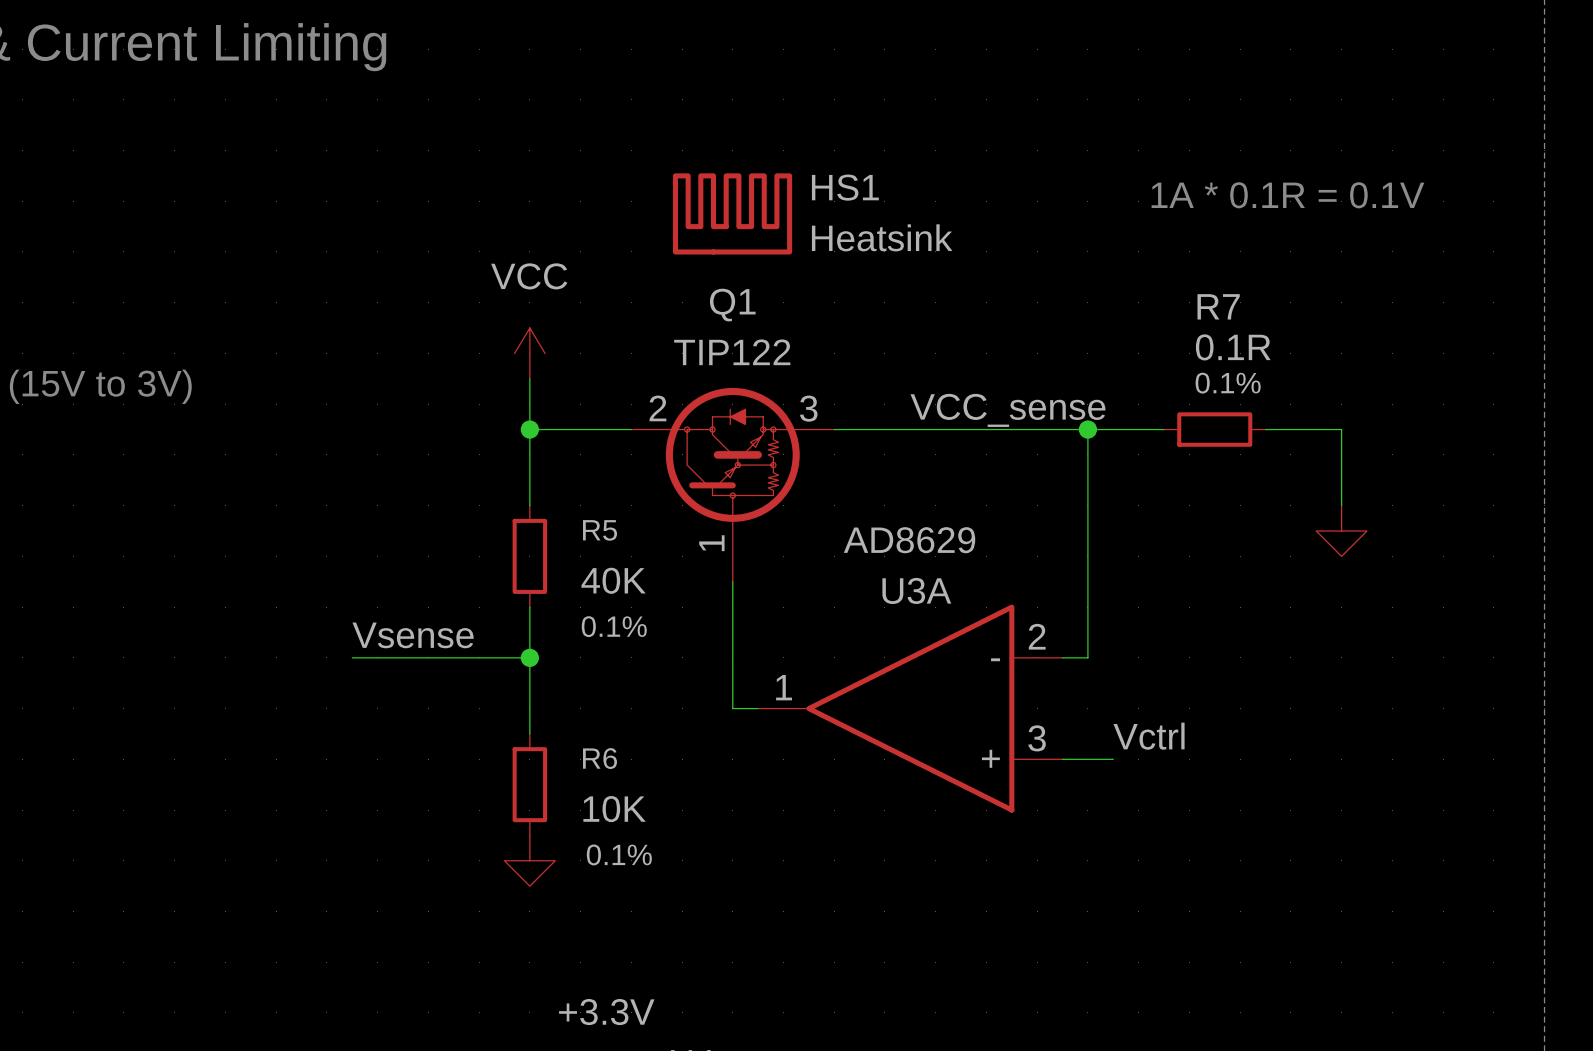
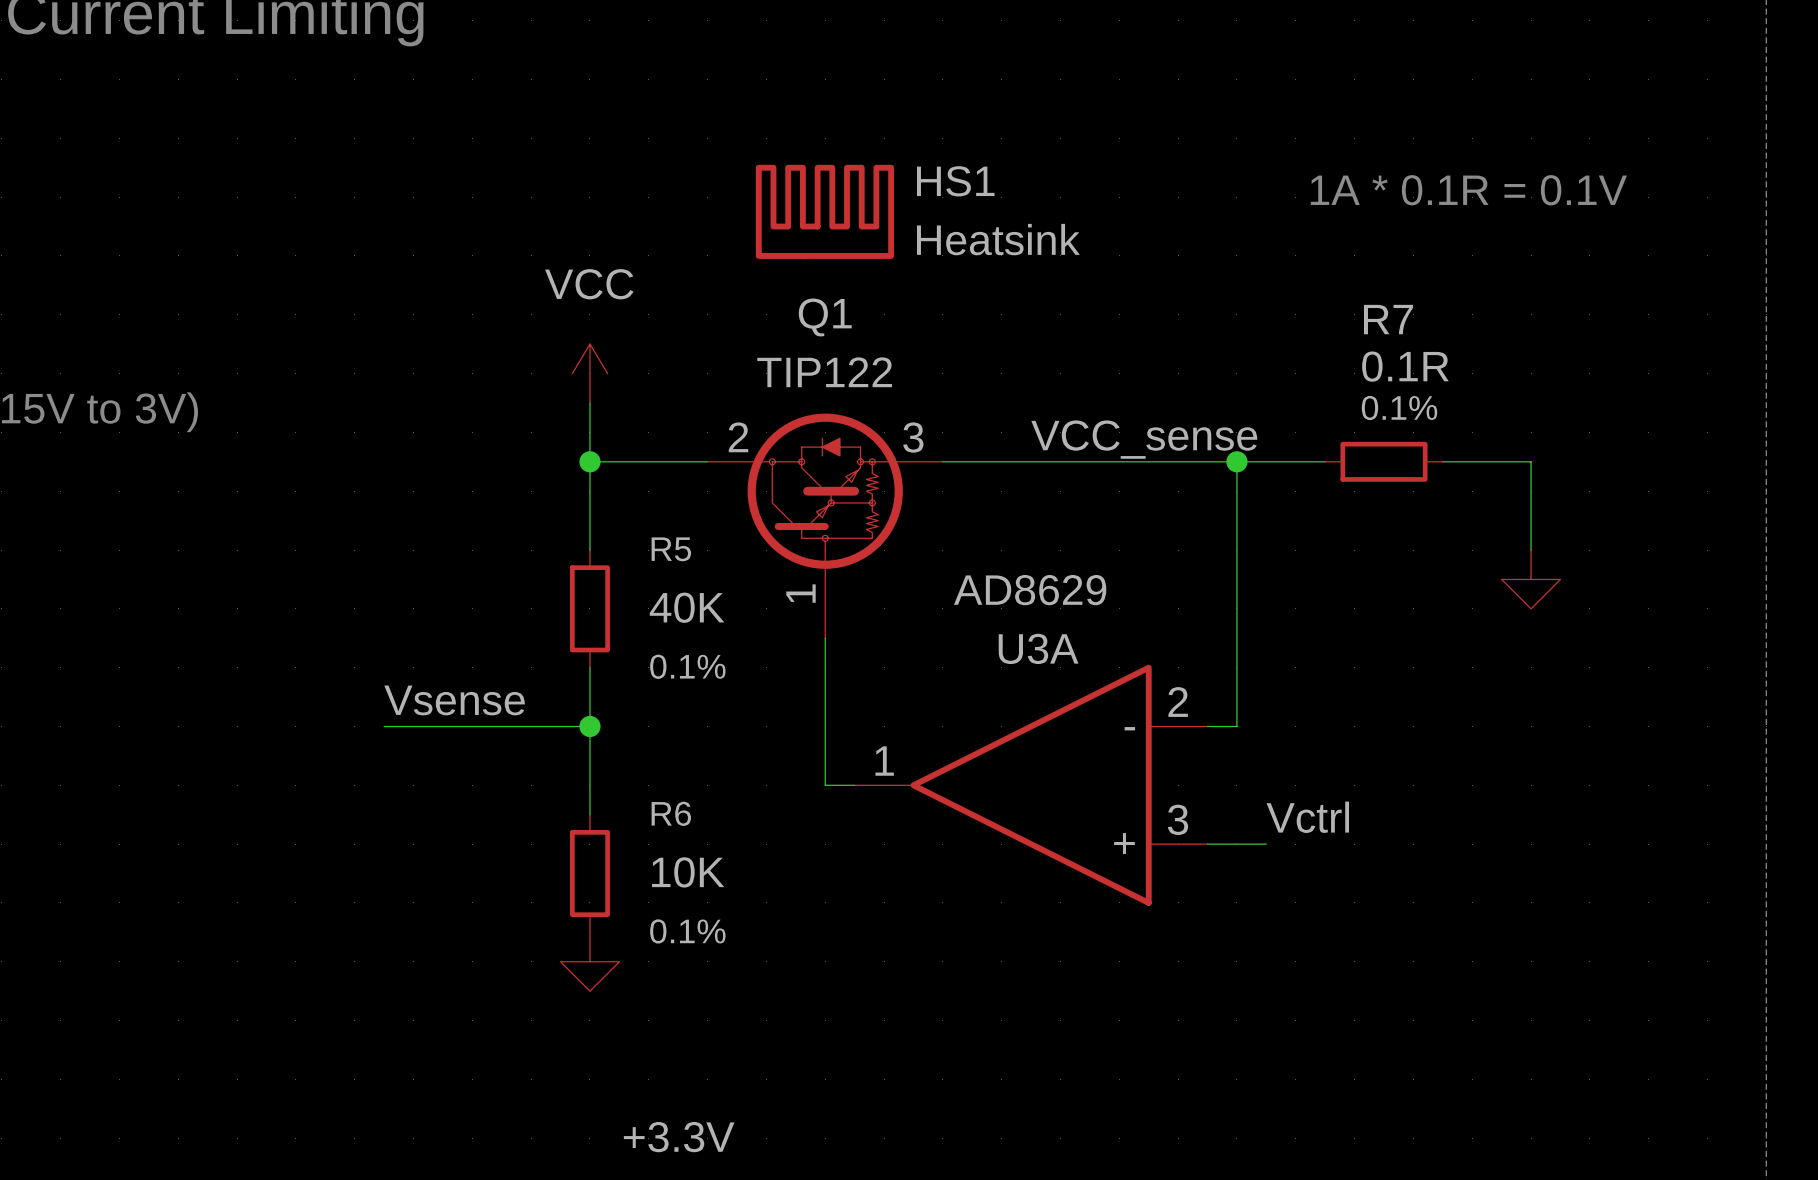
R5 name position: R5 (600, 530) -> R5 (671, 549)
R5 value position: 40K (613, 580) -> 40K (687, 607)
R5 text position: 0.1% (614, 626) -> 0.1% (687, 666)
R6 name position: R6 (600, 758) -> R6 (671, 813)
R6 value position: 10K (614, 809) -> 10K (688, 872)
R6 text position: 0.1% (619, 854) -> 0.1% (687, 931)

